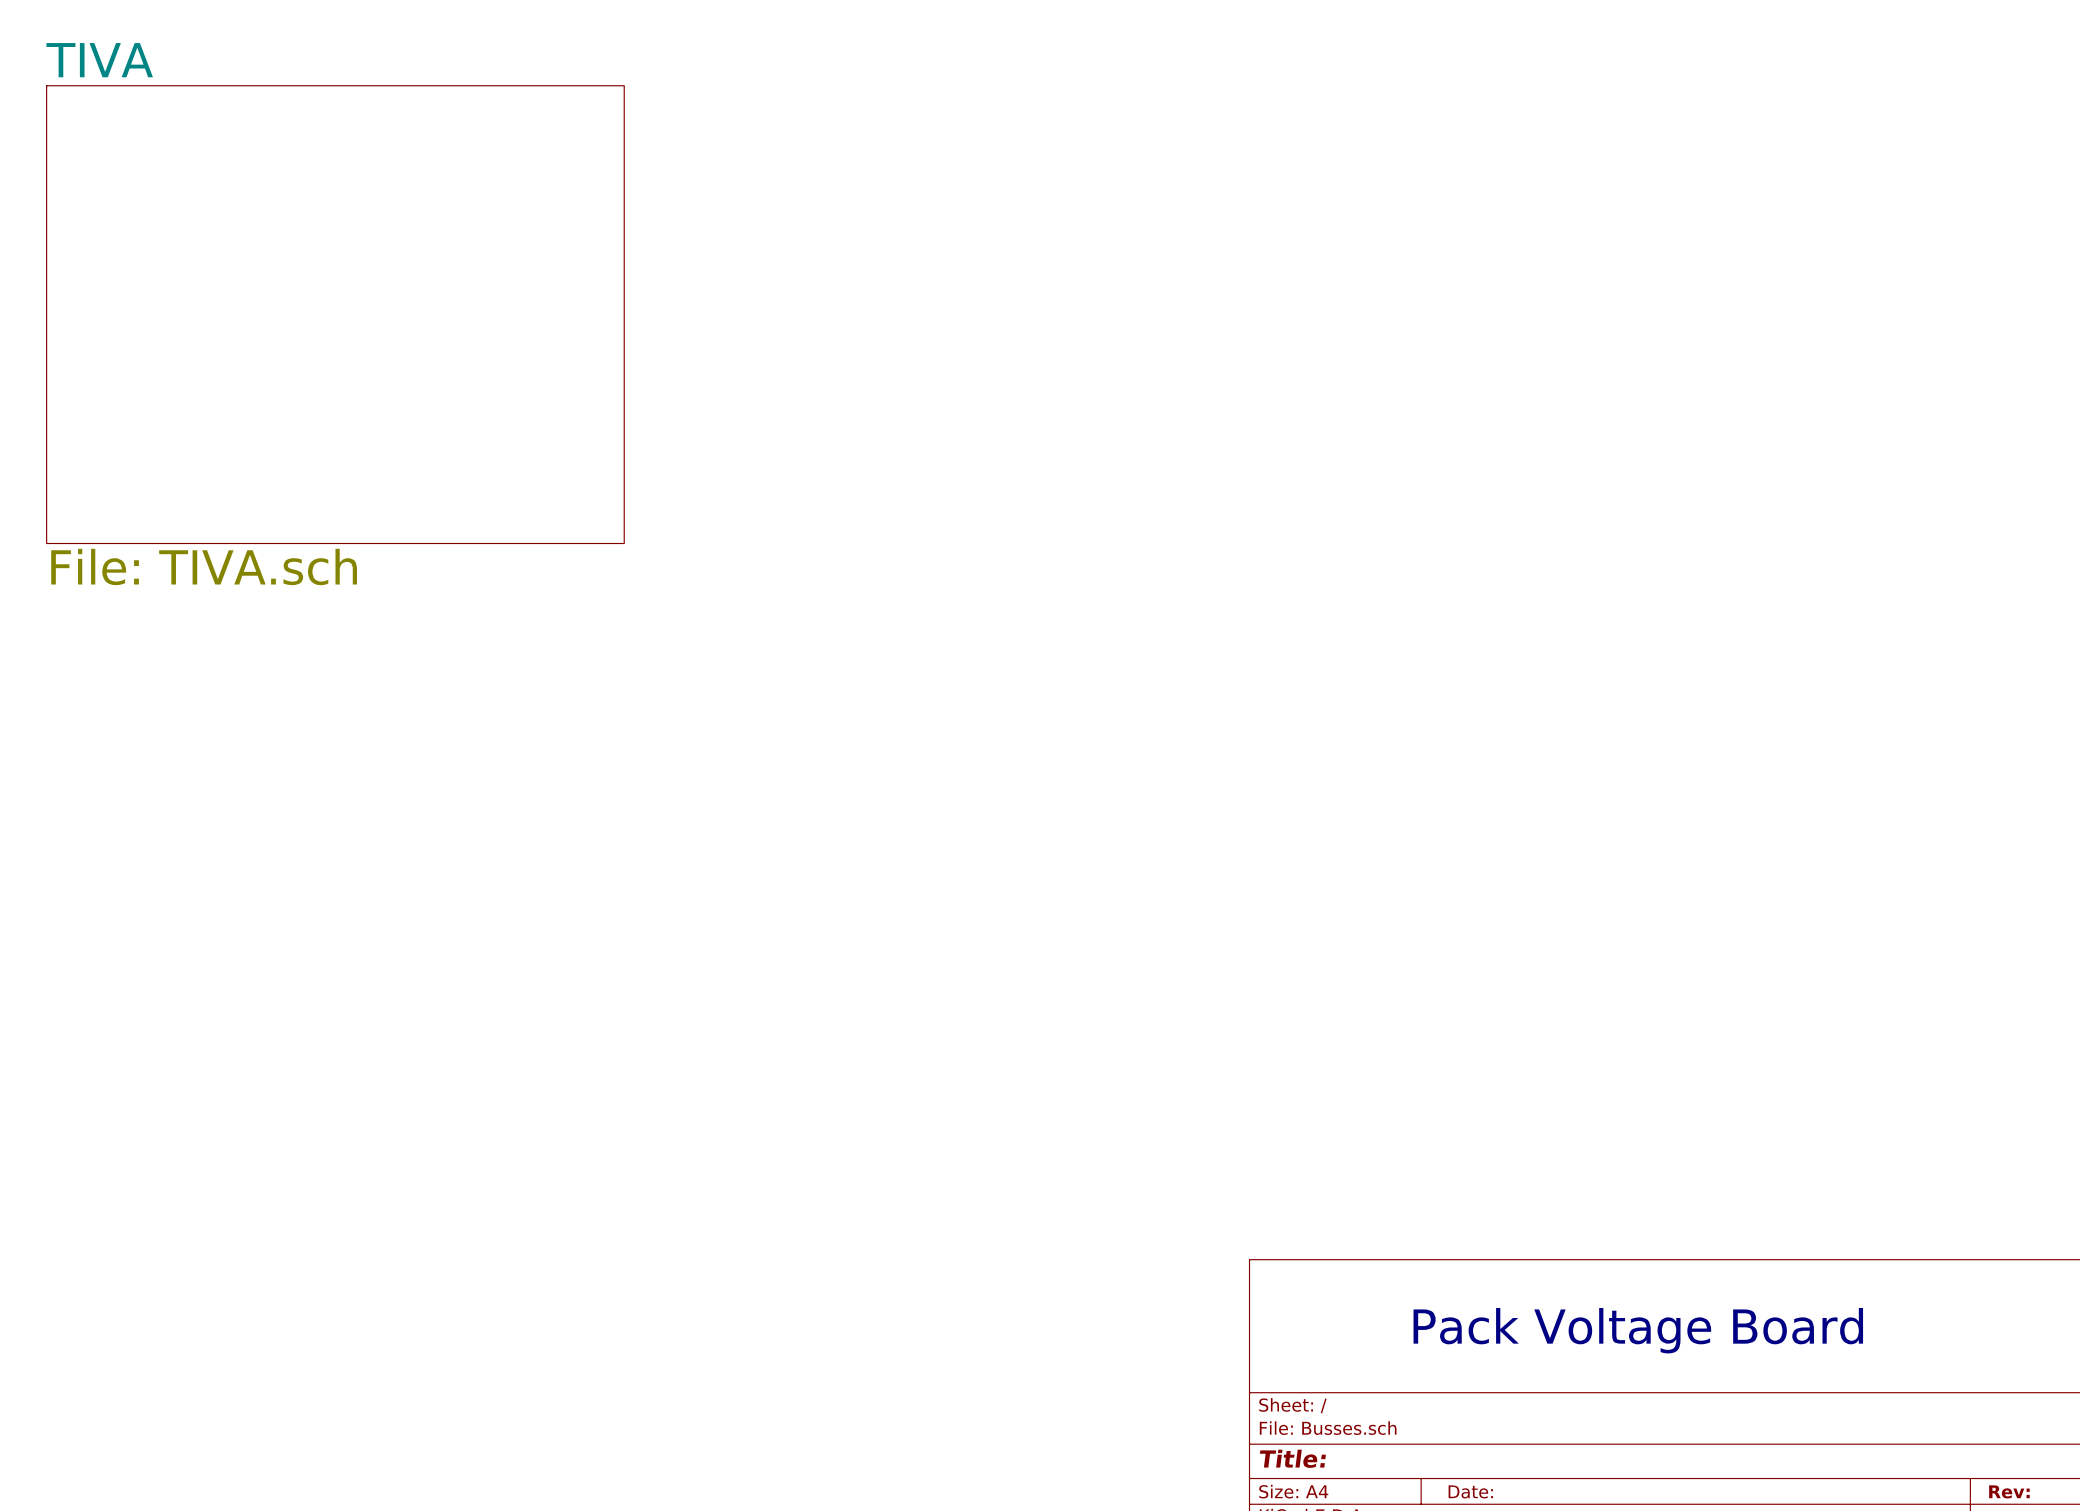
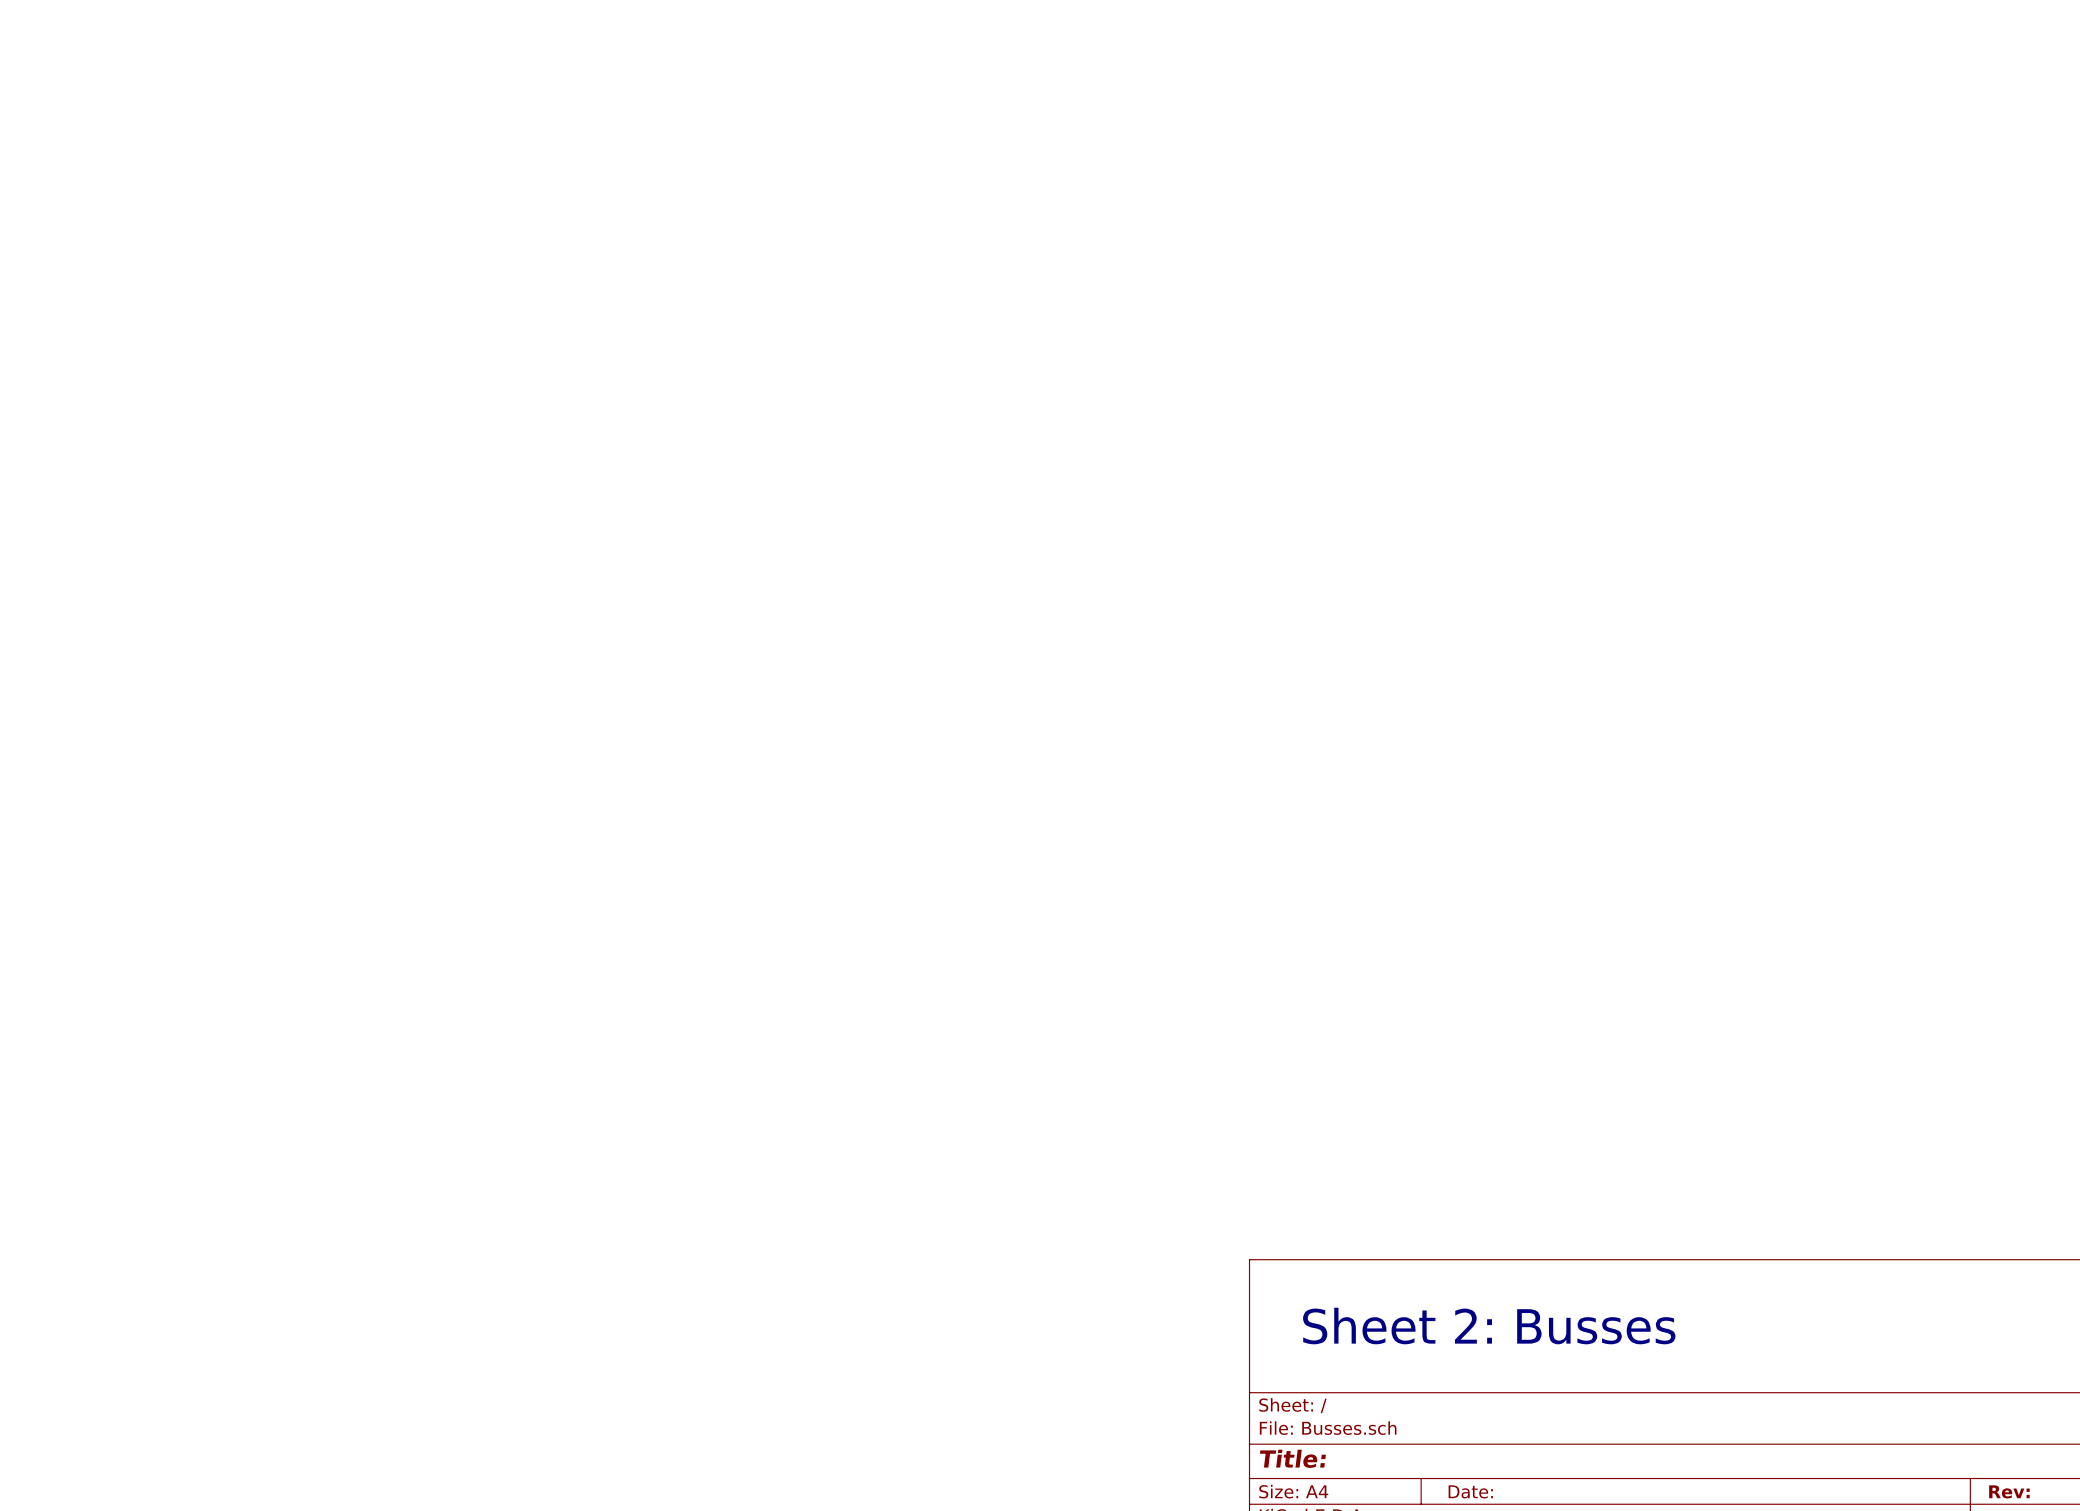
sheet TIVA: File: TIVA.sch (335, 314) -> none
text: none -> Sheet 2: Busses (1489, 1326)
text: Pack Voltage Board (1638, 1330) -> none

